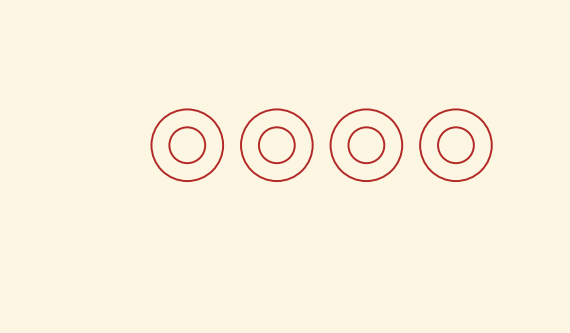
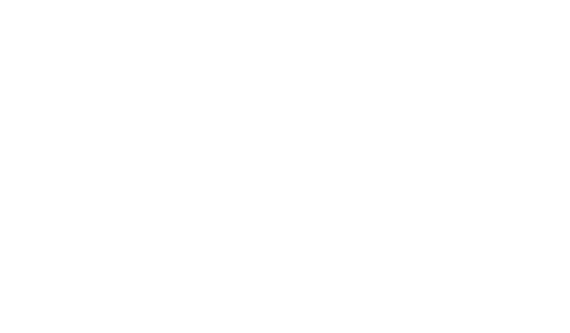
part: (187, 145) -> none
part: (276, 145) -> none
part: (366, 145) -> none
part: (455, 145) -> none

